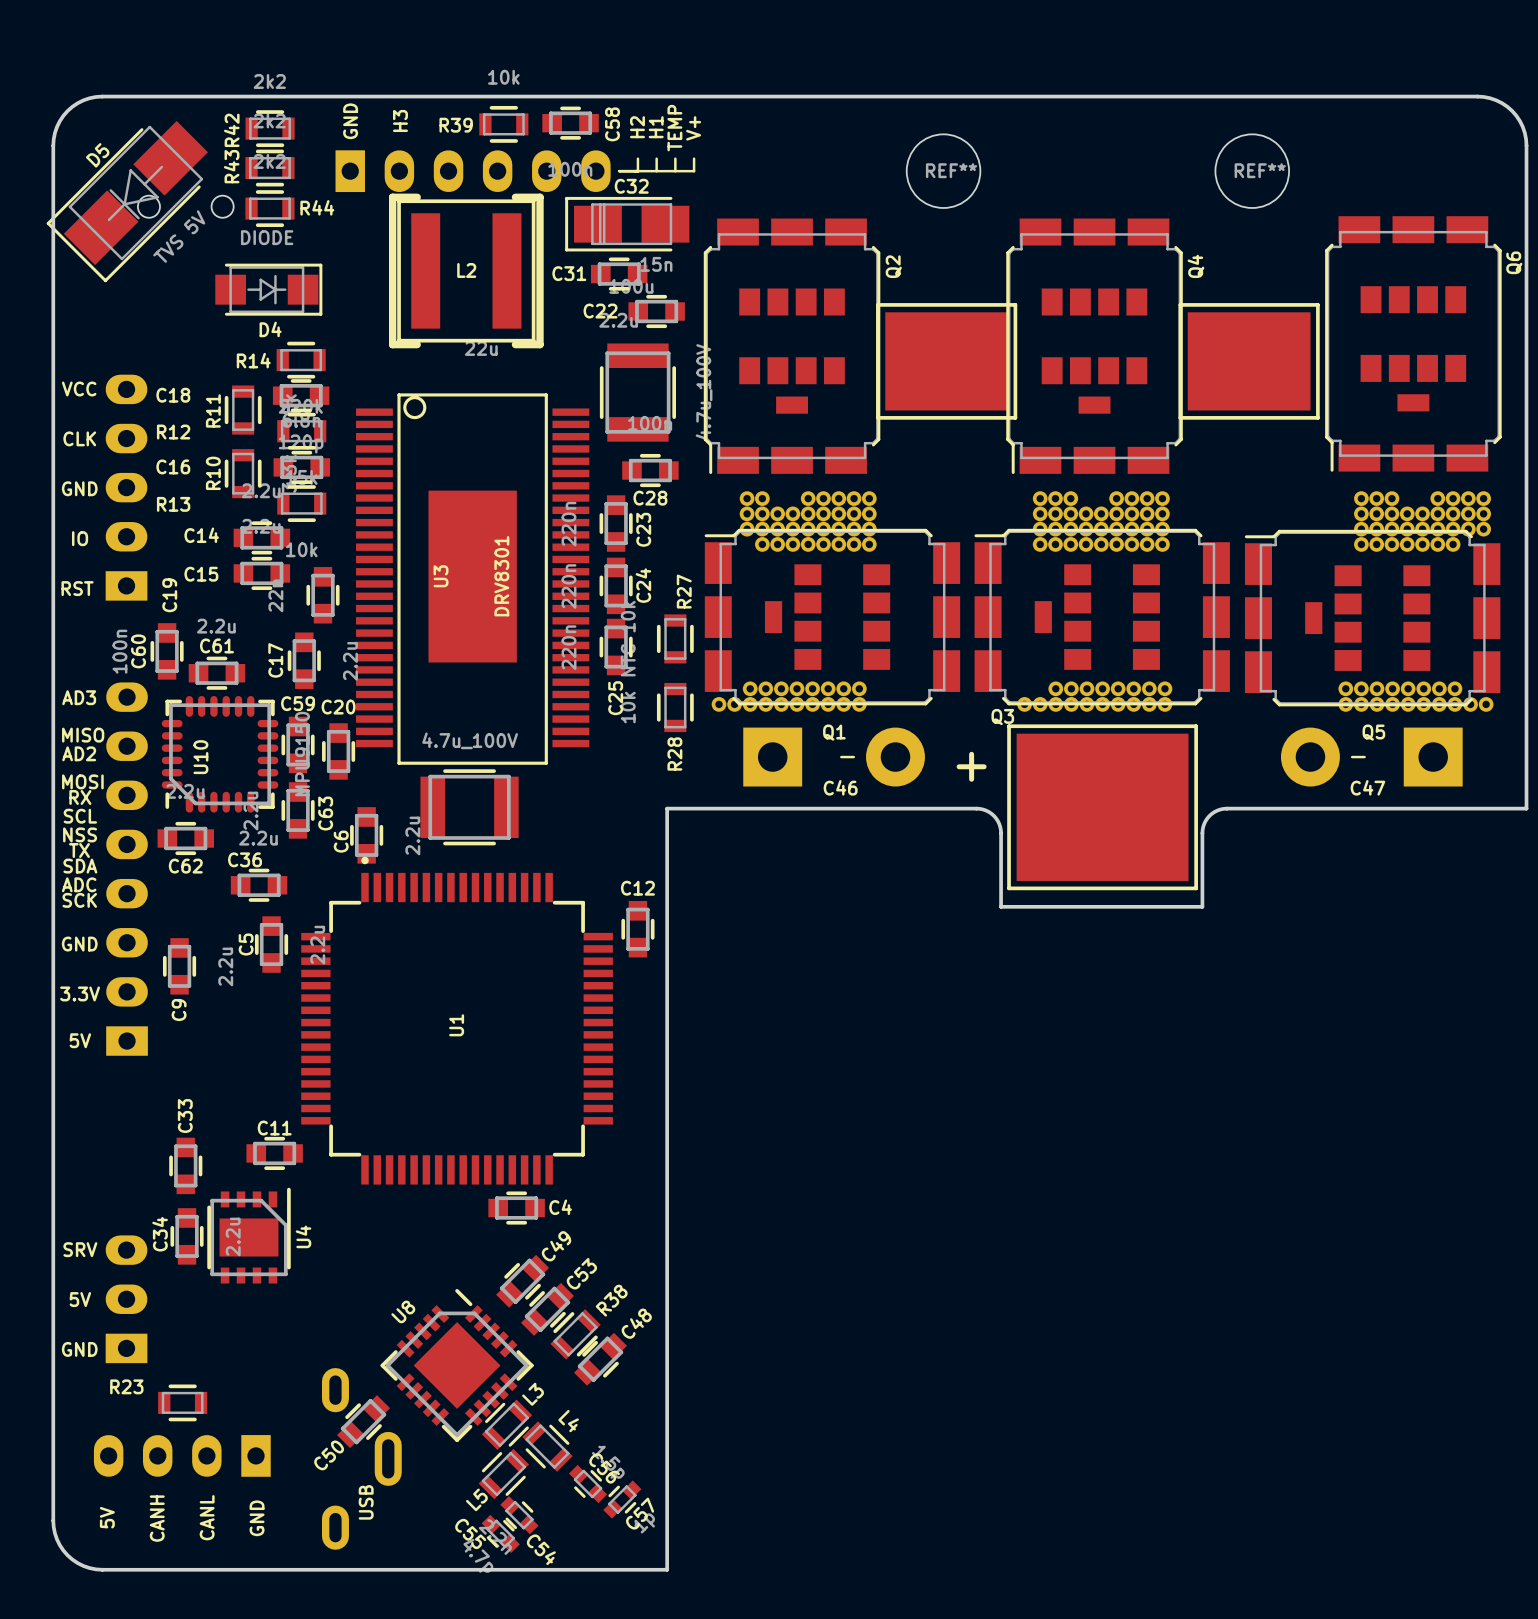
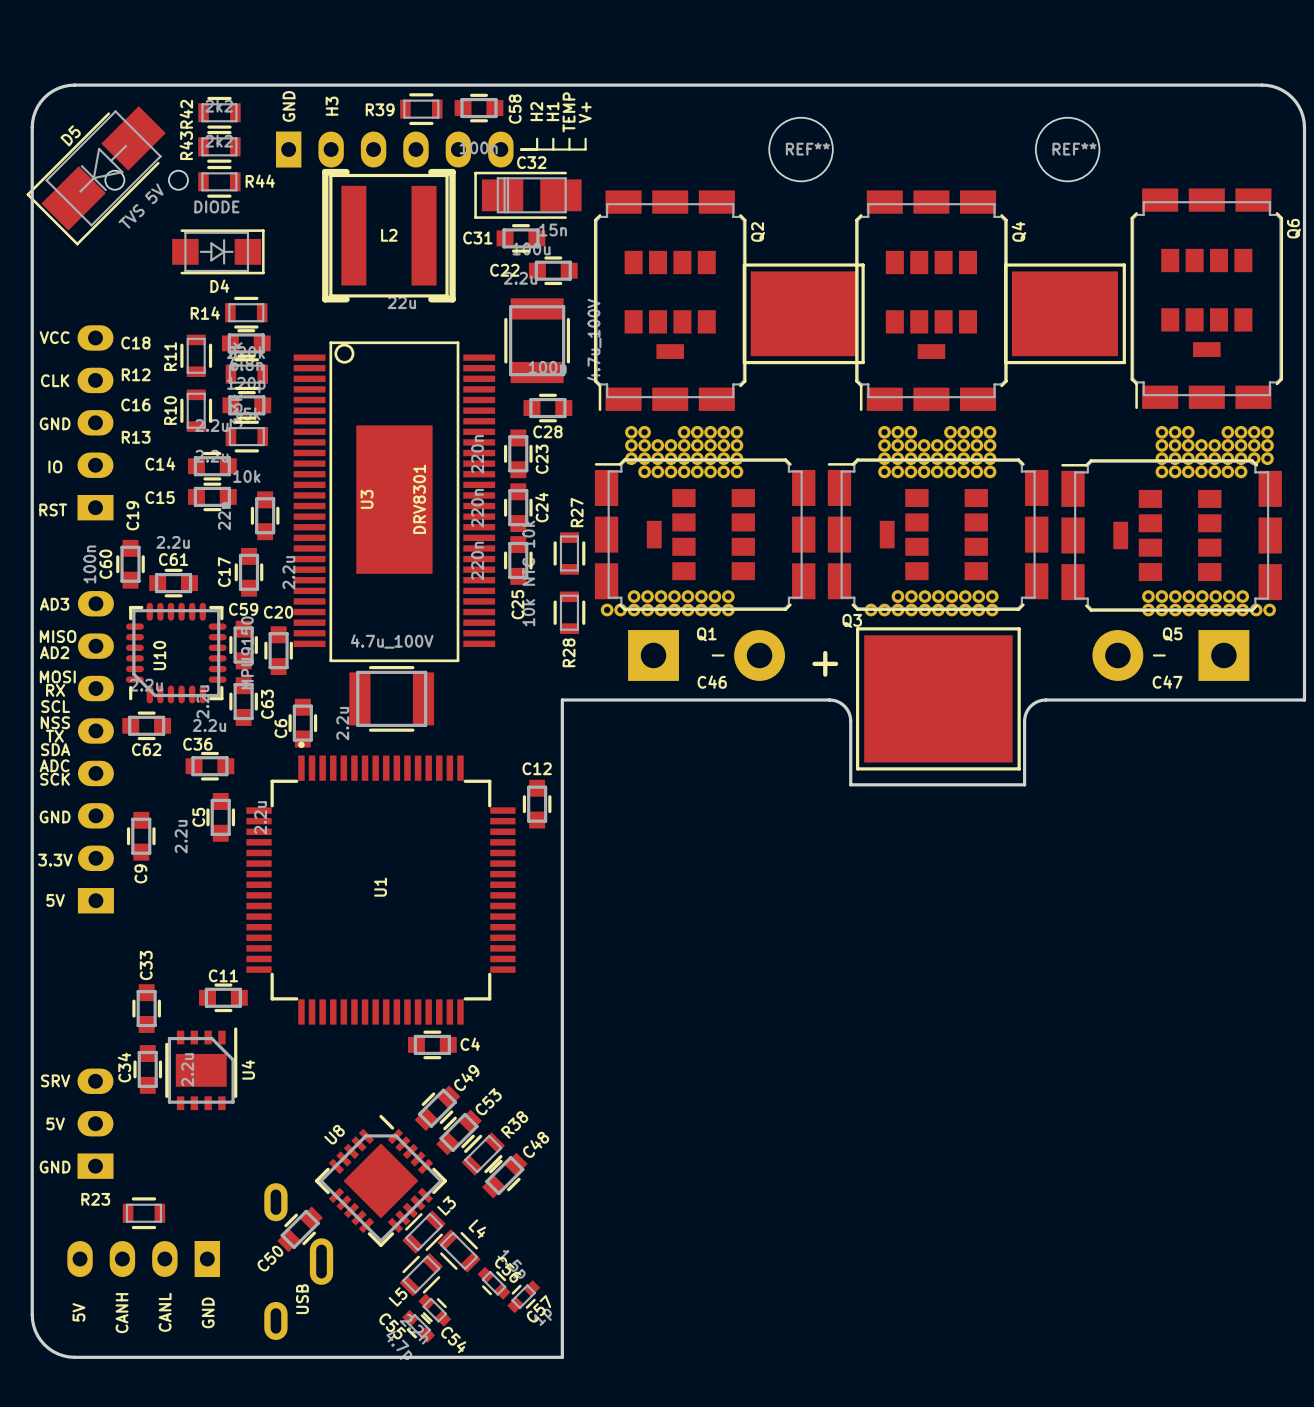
R39 value: 10k (503, 77) -> none
R42 value: 2k2 (269, 81) -> none

